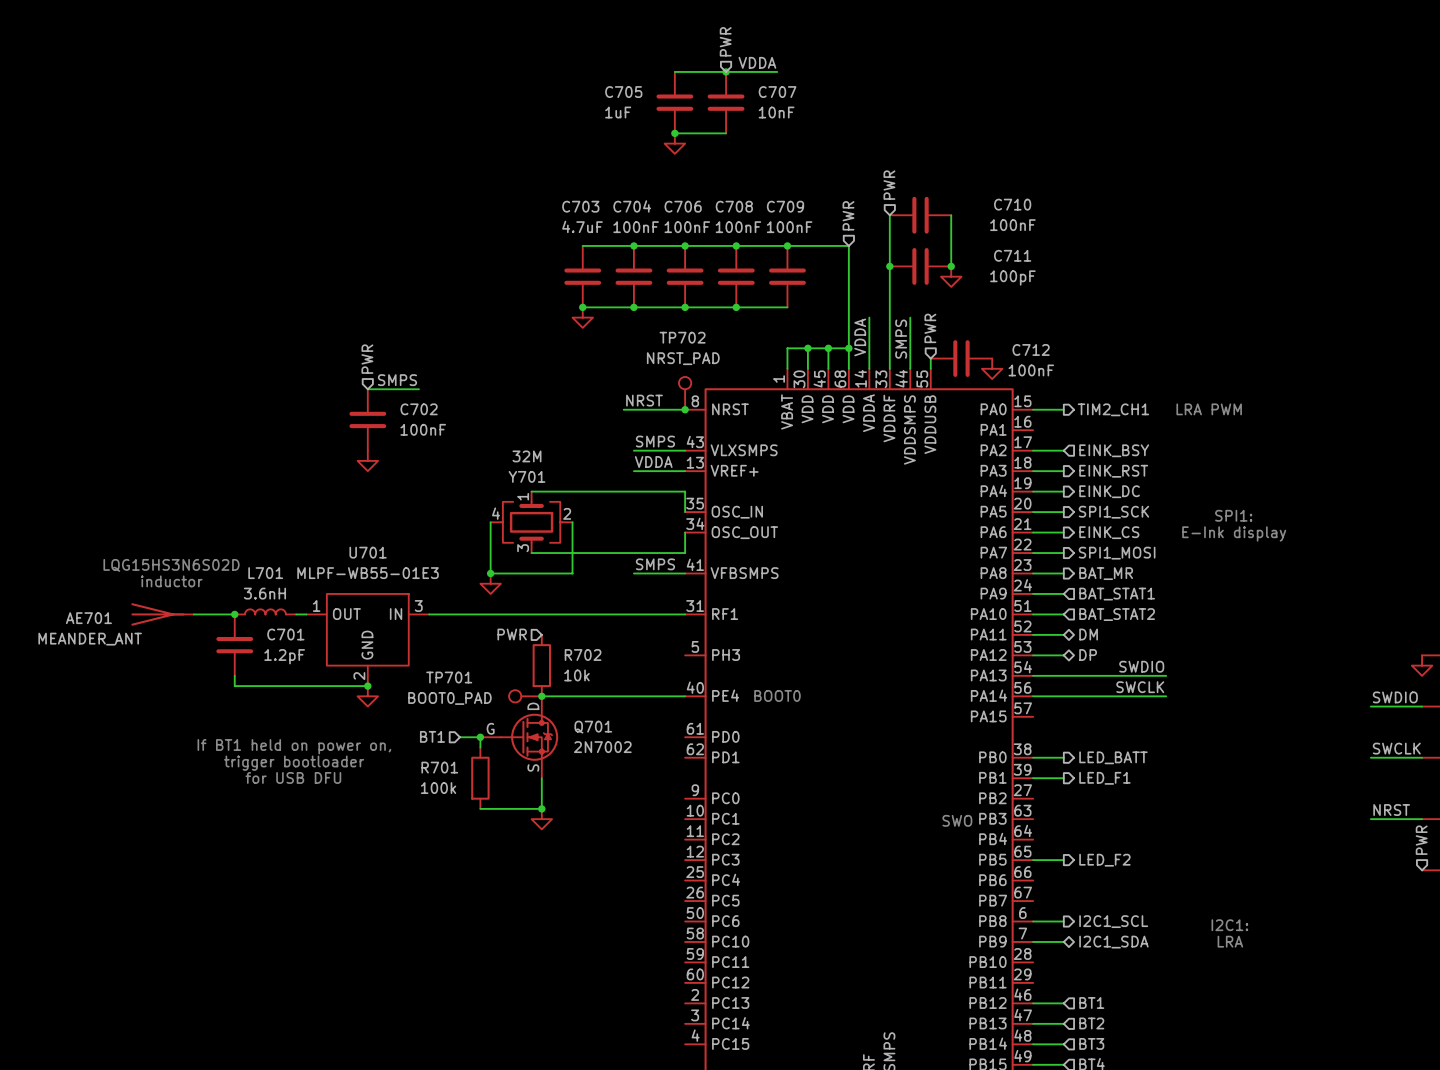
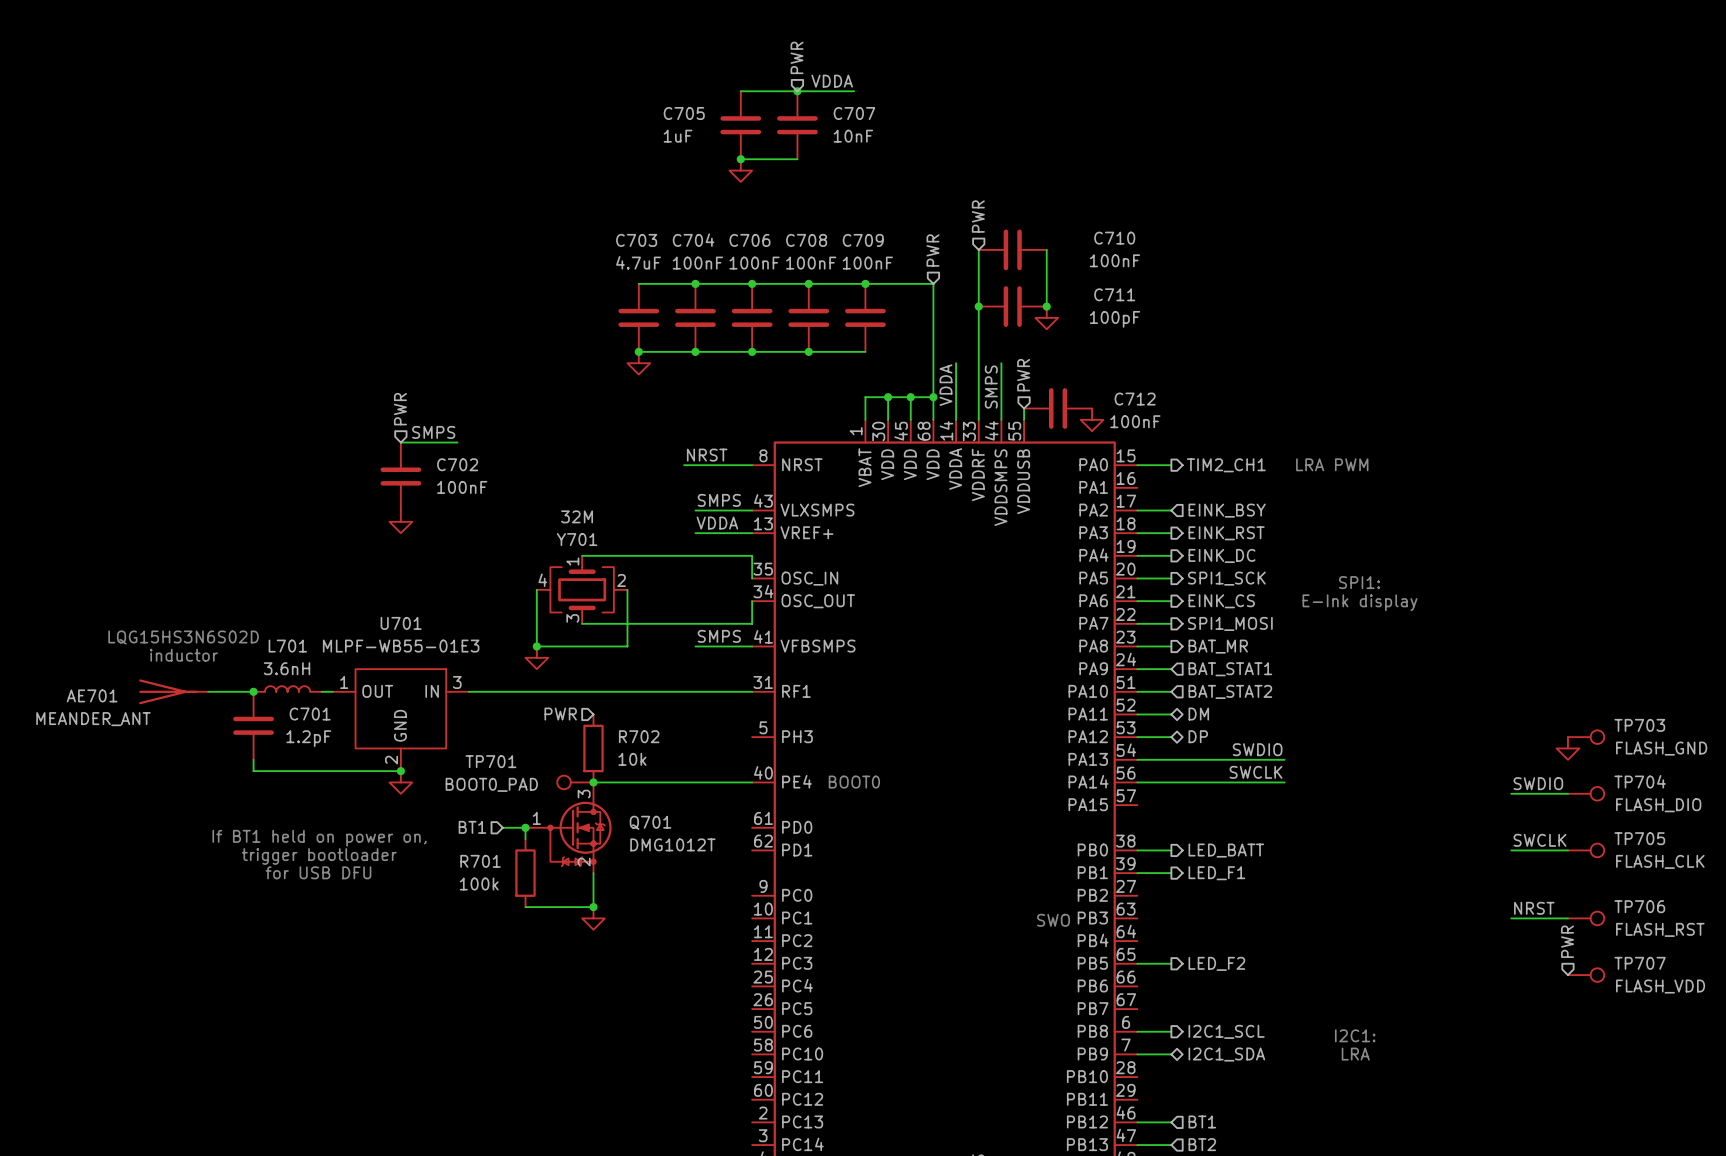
TP702: NRST_PAD (685, 393) -> none
junction: (685, 409) -> none
Q701 symbol: [480, 696, 559, 779] -> [525, 782, 612, 874]
Q701 value: 2N7002 (602, 747) -> DMG1012T (672, 844)

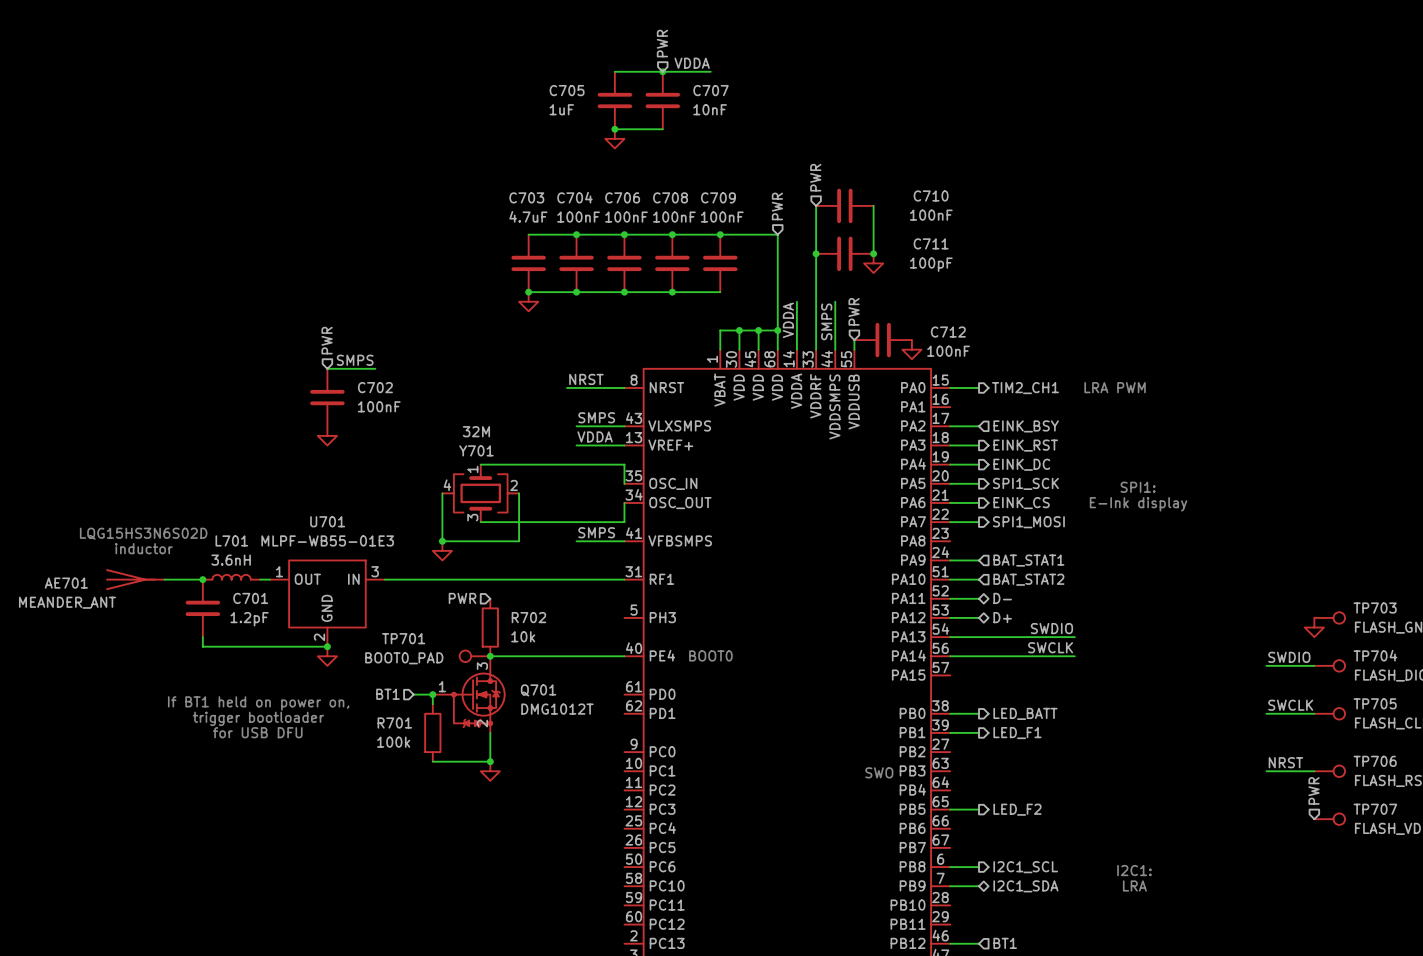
wire: (1137, 646) (1171, 646) -> none
hierarchical label: BAT_MR (1218, 646) -> none
hierarchical label: DM (1198, 714) -> D- (1002, 598)
hierarchical label: DP (1198, 736) -> D+ (1002, 617)

